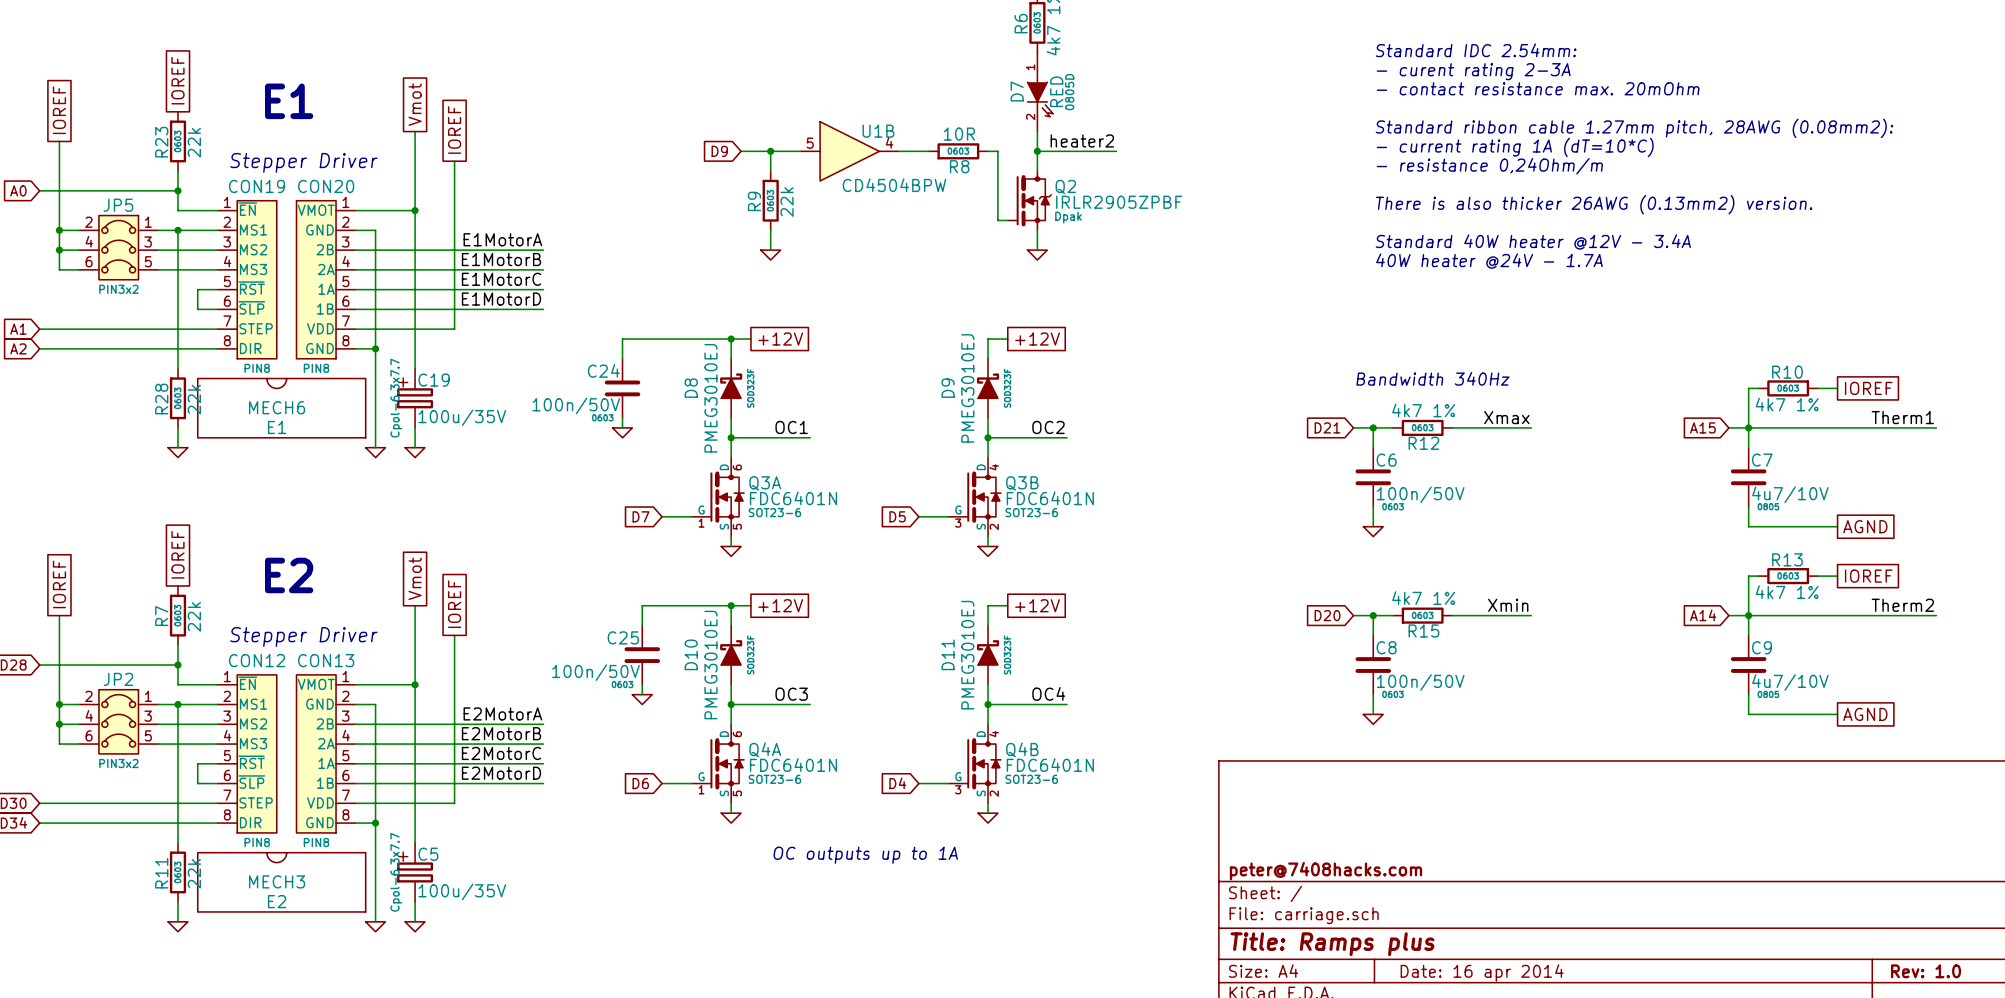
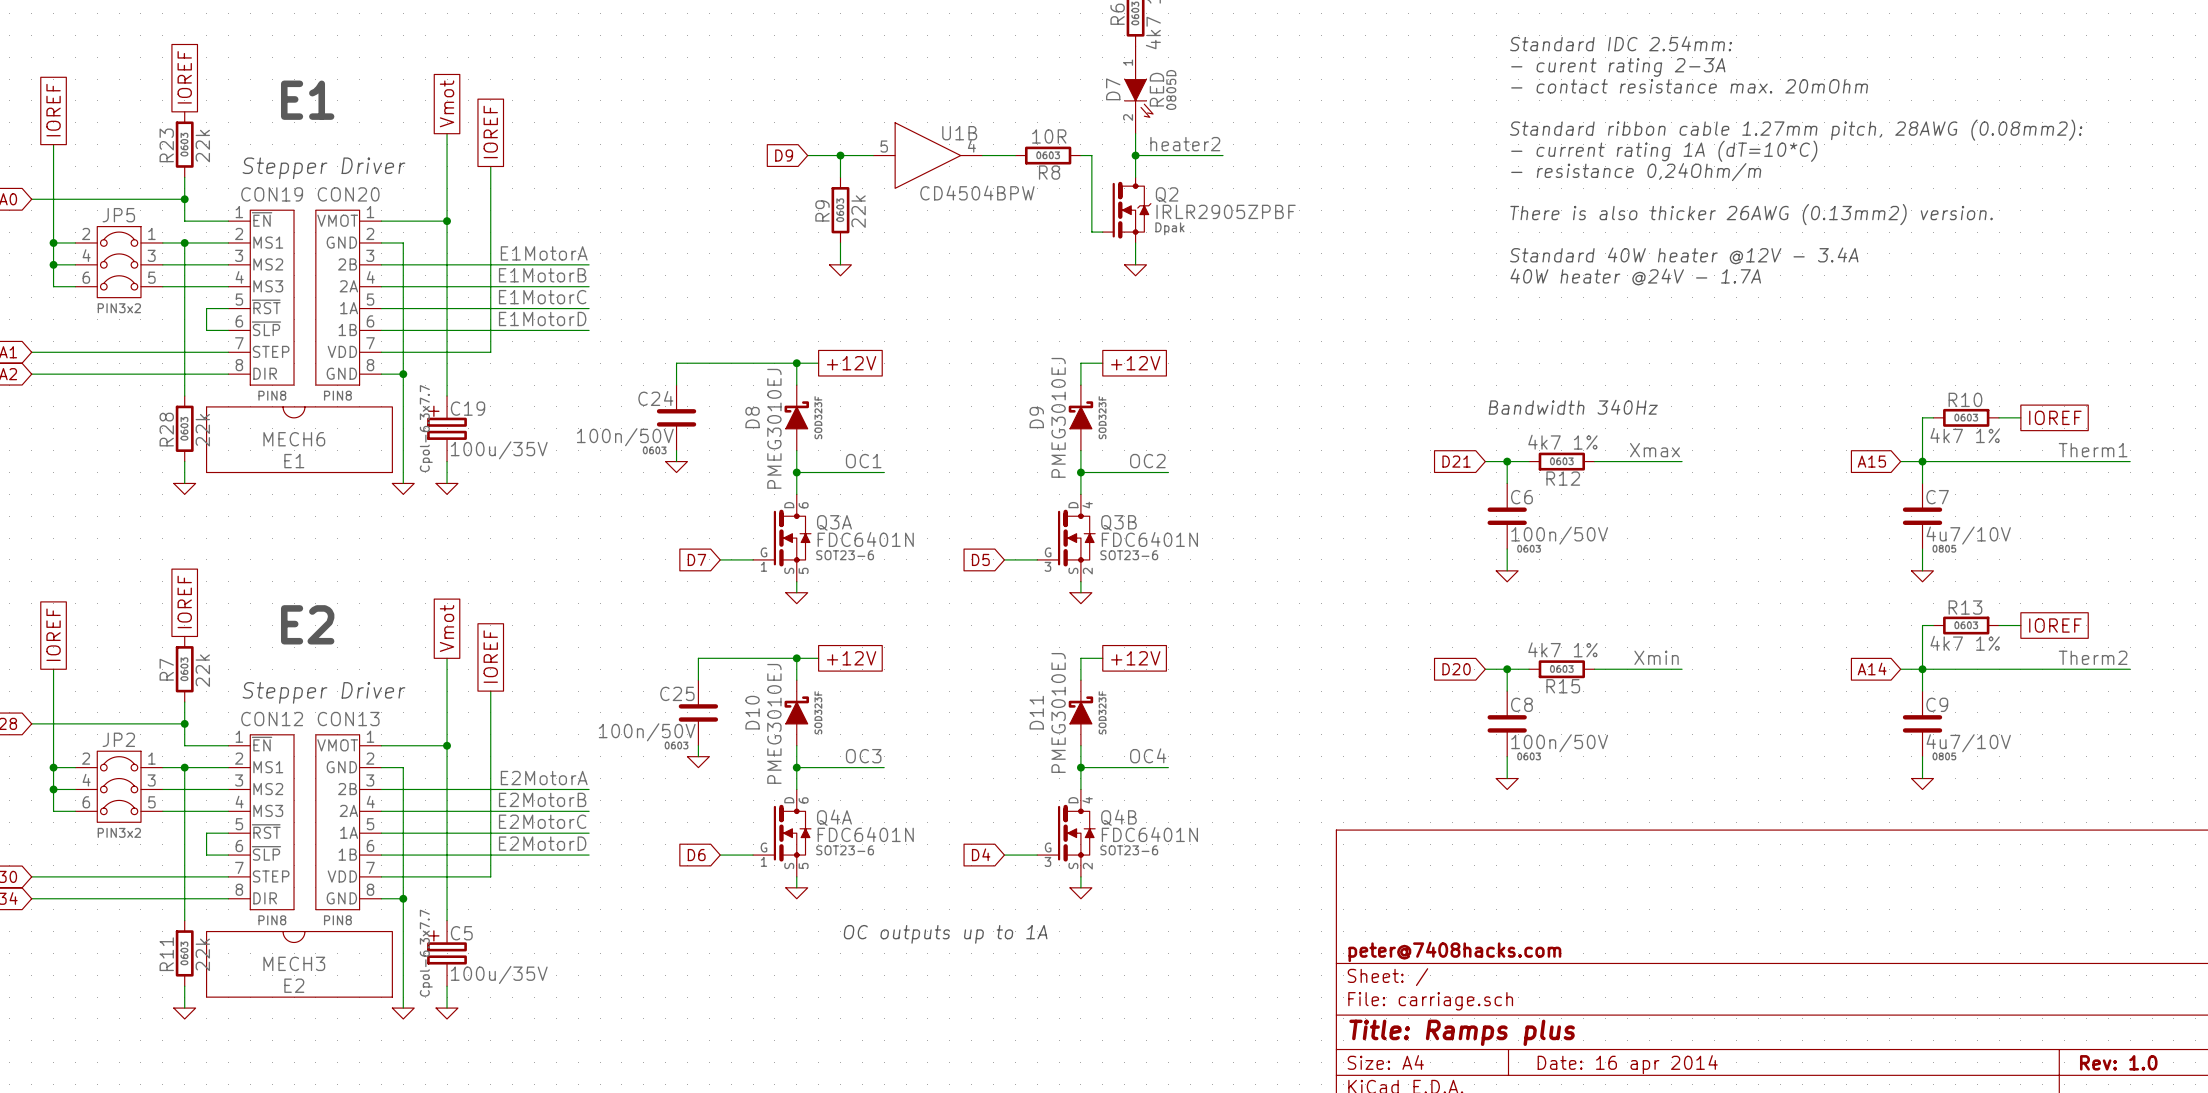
wire: (1748, 526) (1837, 526) -> none
global label: AGND (1865, 526) -> none
power symbol: none -> (1922, 576)
wire: (1748, 714) (1837, 714) -> none
global label: AGND (1865, 714) -> none
power symbol: none -> (1922, 784)

